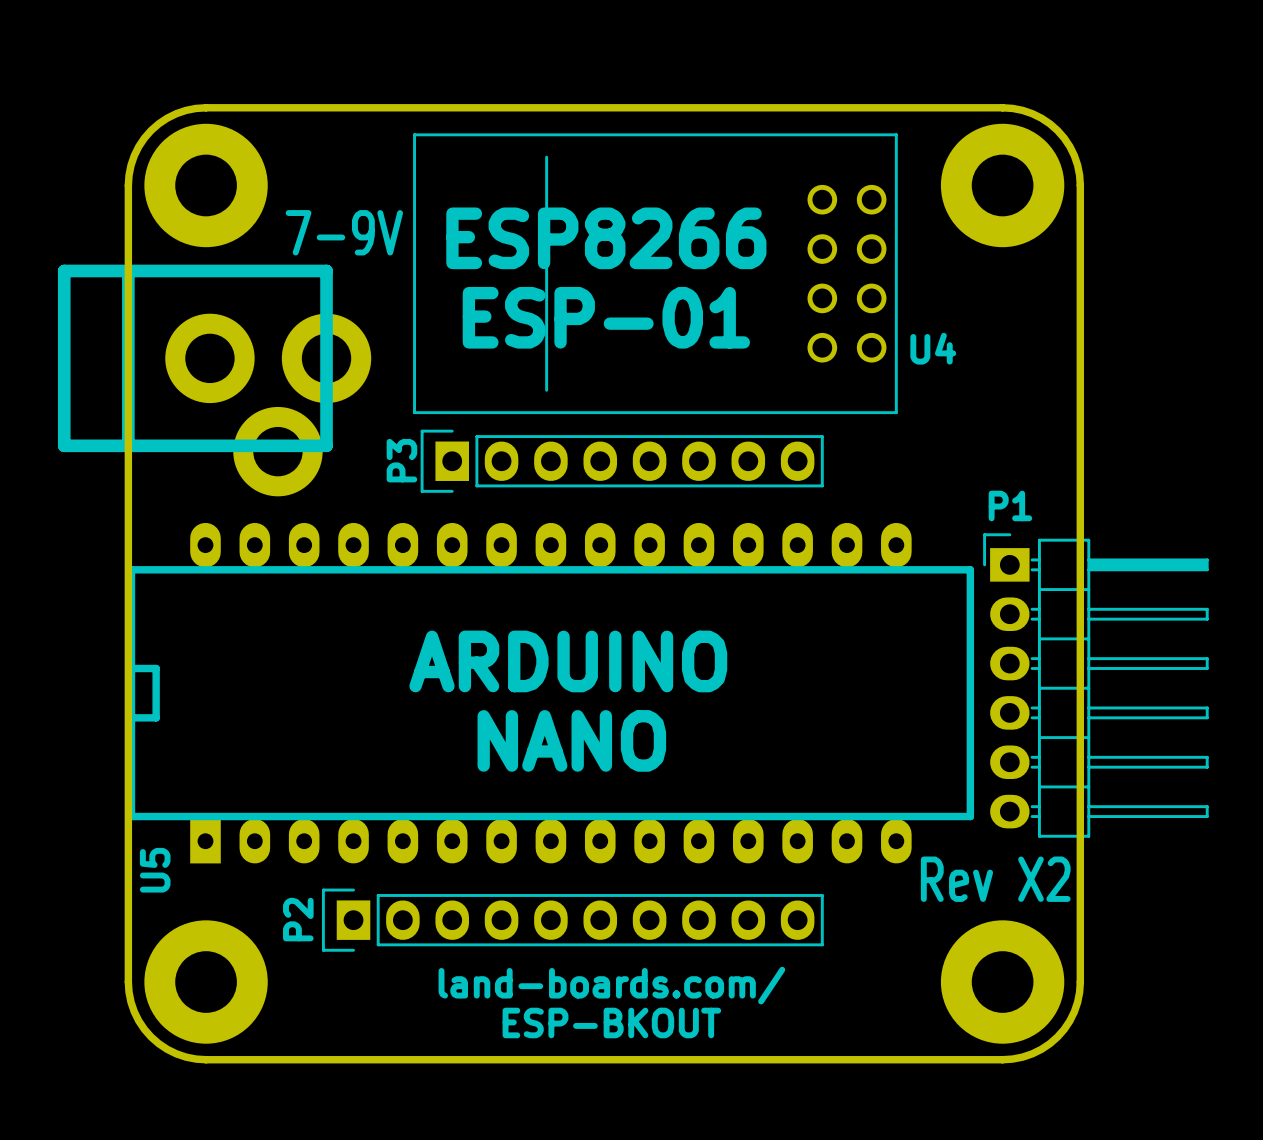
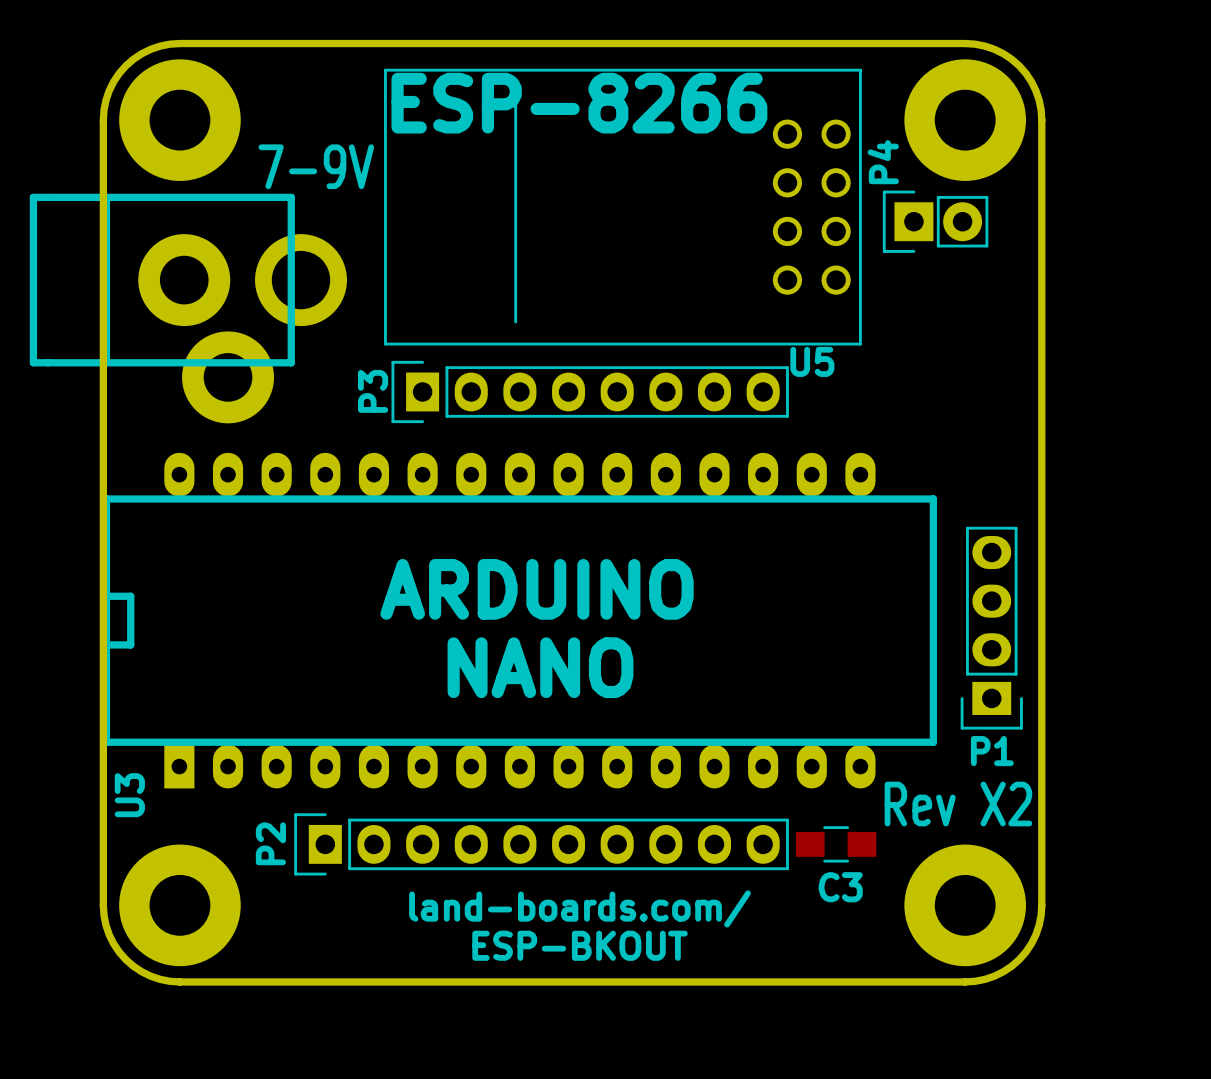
text: ESP8266 (606, 238) -> ESP-8266 (579, 103)
part footprint: [57, 264, 372, 497] -> [29, 193, 347, 424]
P4: none -> (935, 221)
text: ESP-01 (606, 317) -> none
U4 name: U4 (933, 348) -> U5 (812, 361)
P1 name position: P1 (1010, 505) -> P1 (992, 751)
P1 footprint: [983, 533, 1209, 838] -> [960, 526, 1023, 730]
U5 name: U5 (155, 870) -> U3 (129, 795)
C3: none -> (836, 844)

